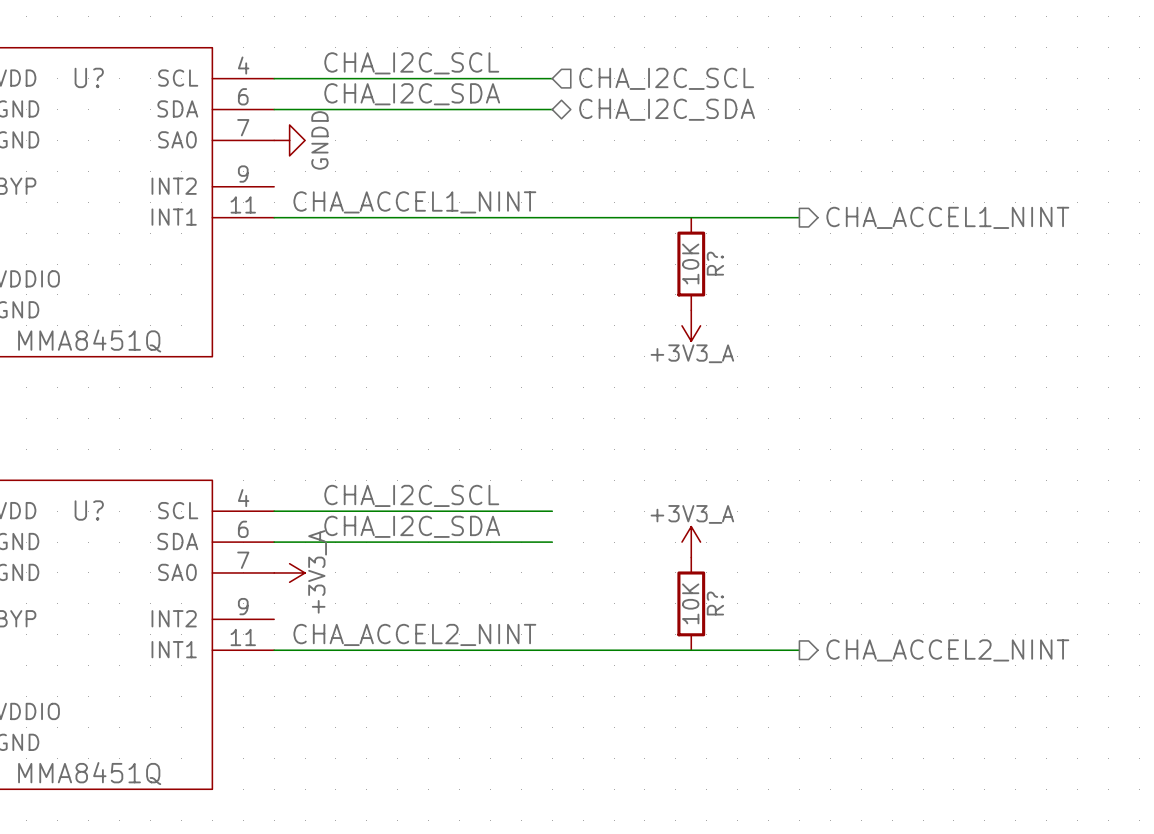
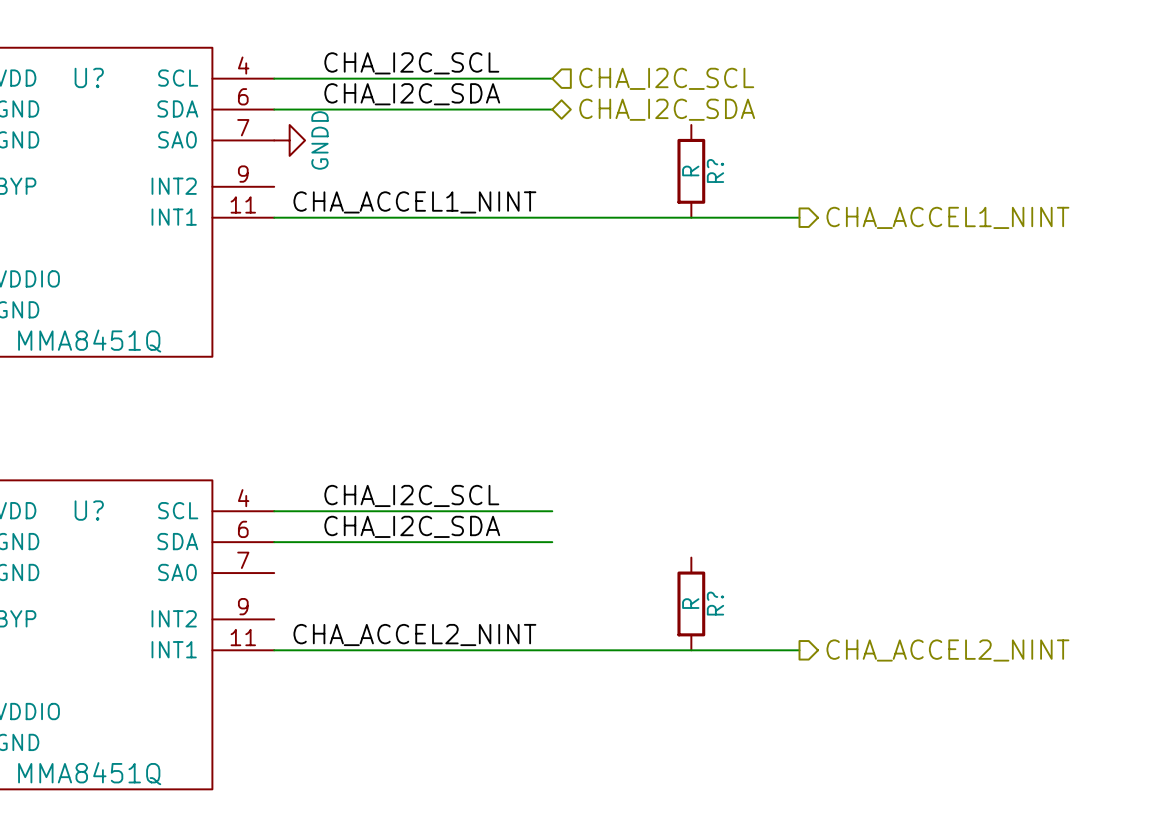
R?: none -> R (691, 171)
R?: 10K (691, 264) -> none
power symbol: +3V3_A (691, 325) -> none
power symbol: +3V3_A (691, 542) -> none
power symbol: +3V3_A (289, 572) -> none
R? value: 10K (690, 603) -> R (690, 603)

